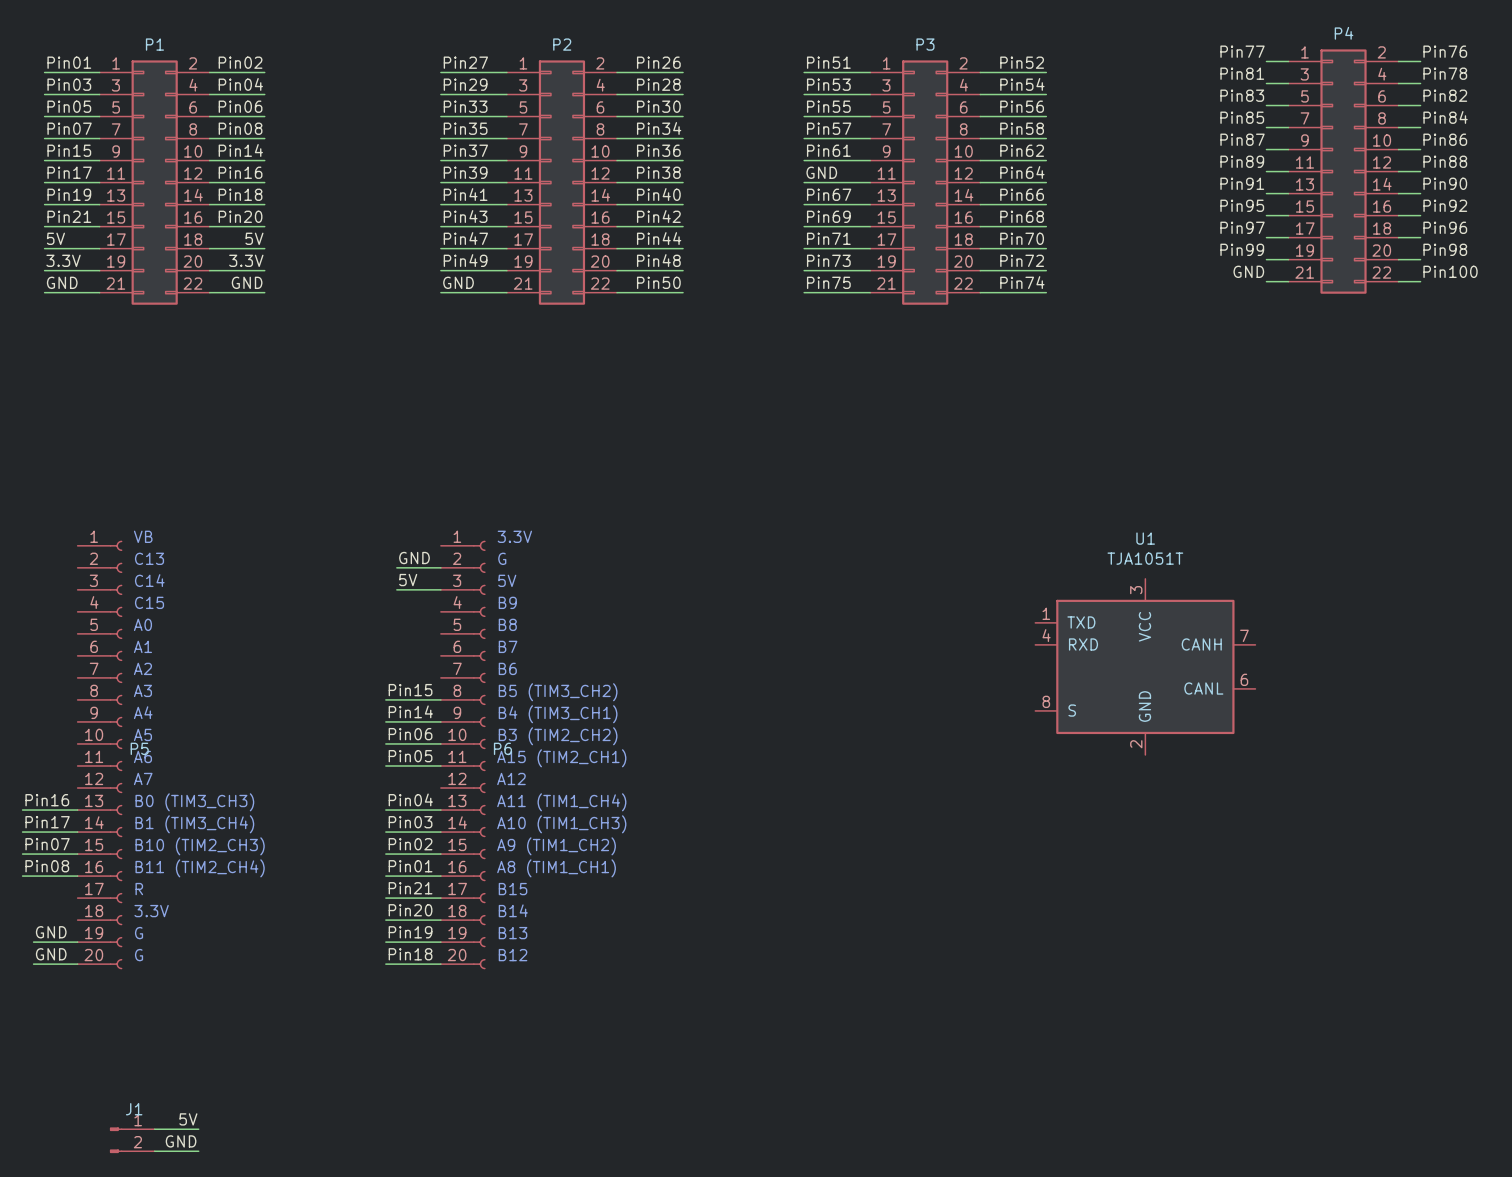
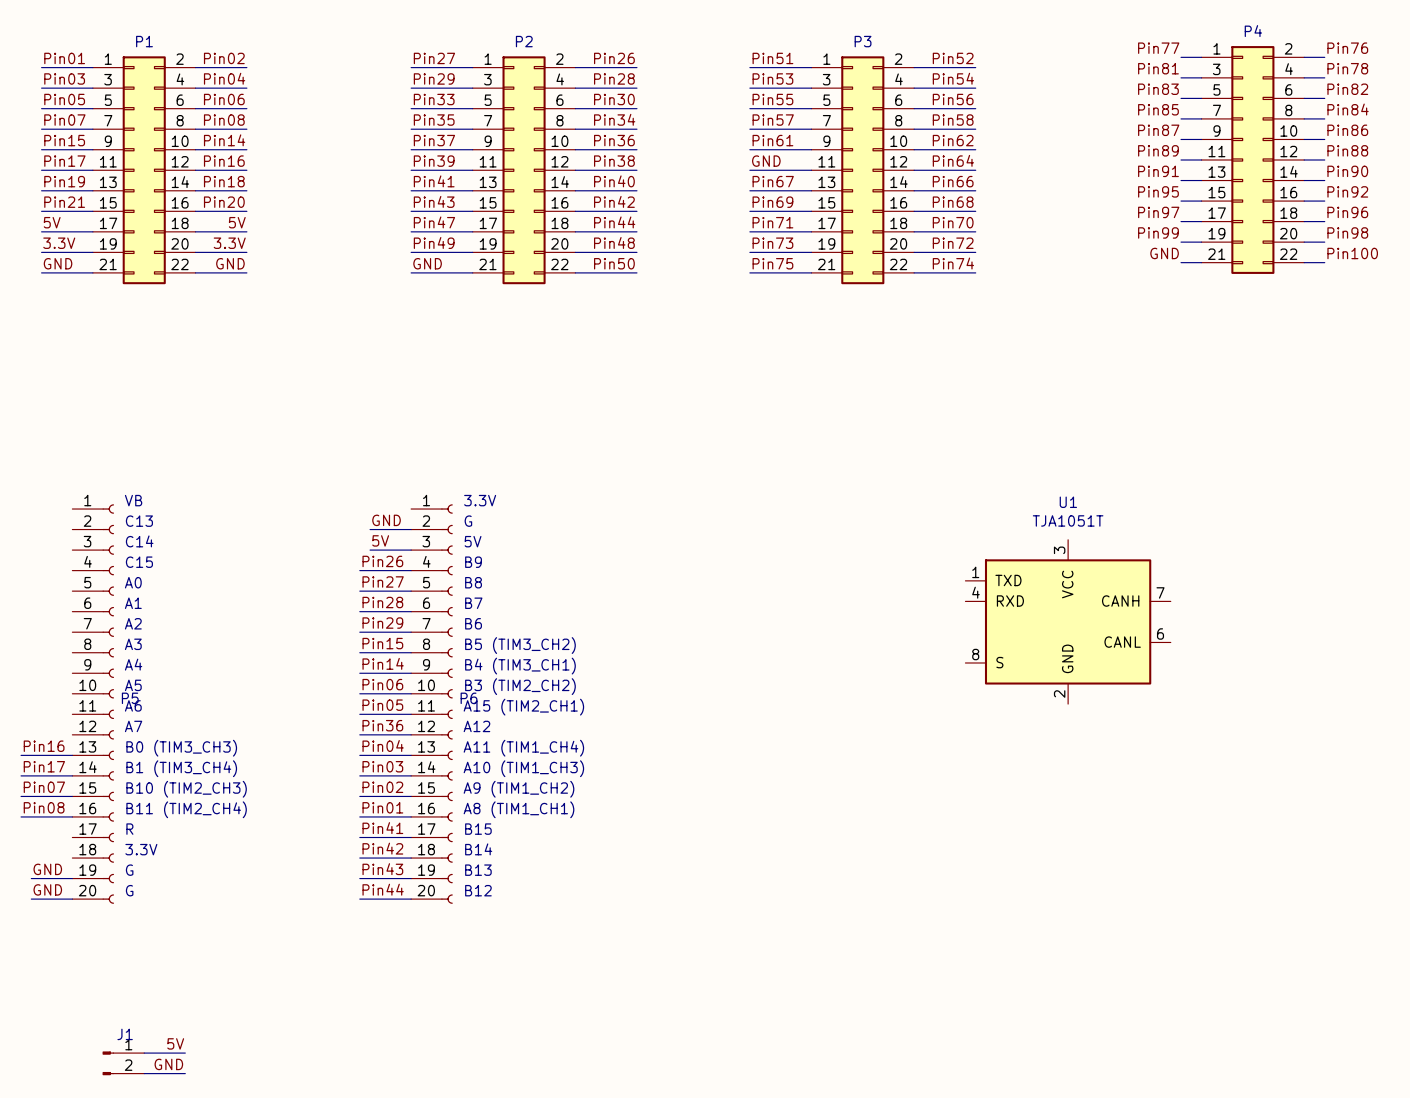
label: none -> Pin26 (382, 561)
wire: none -> (359, 570) (411, 570)
label: none -> Pin27 (383, 581)
wire: none -> (359, 591) (411, 591)
label: none -> Pin28 (382, 602)
wire: none -> (359, 611) (411, 611)
label: none -> Pin29 (382, 623)
wire: none -> (359, 632) (411, 632)
label: none -> Pin36 (382, 725)
wire: none -> (359, 734) (411, 734)
label: Pin21 (410, 888) -> Pin41 (382, 828)
label: Pin20 (410, 910) -> Pin42 (382, 848)
label: Pin19 (410, 932) -> Pin43 (382, 869)
label: Pin18 (410, 954) -> Pin44 (383, 889)

